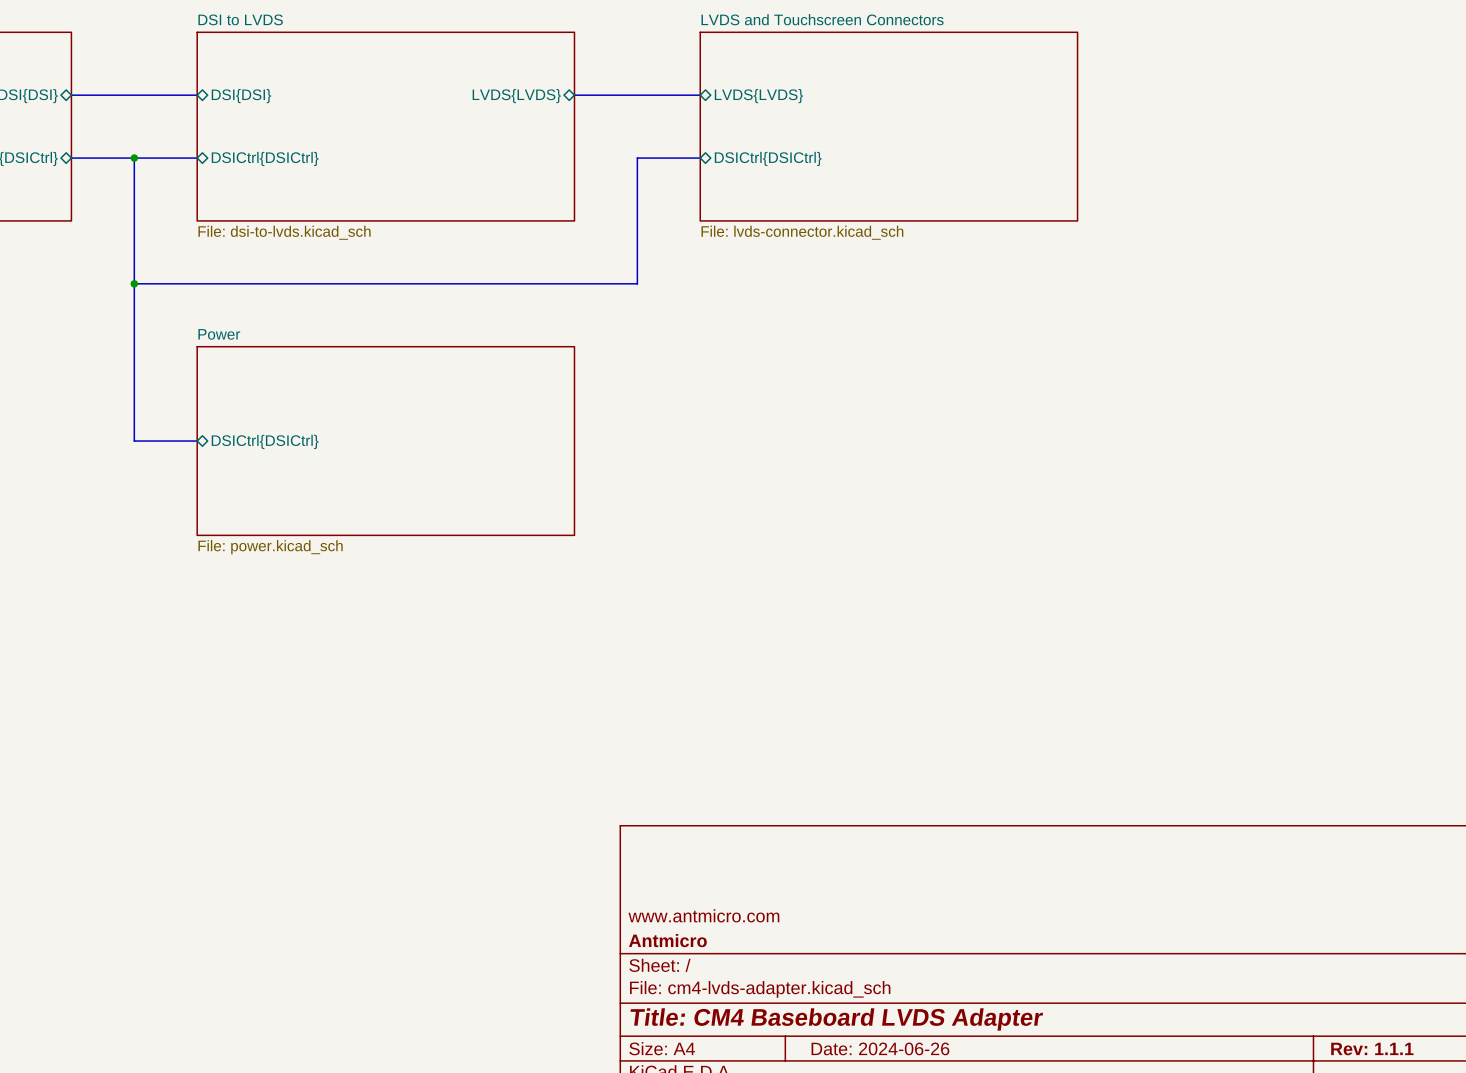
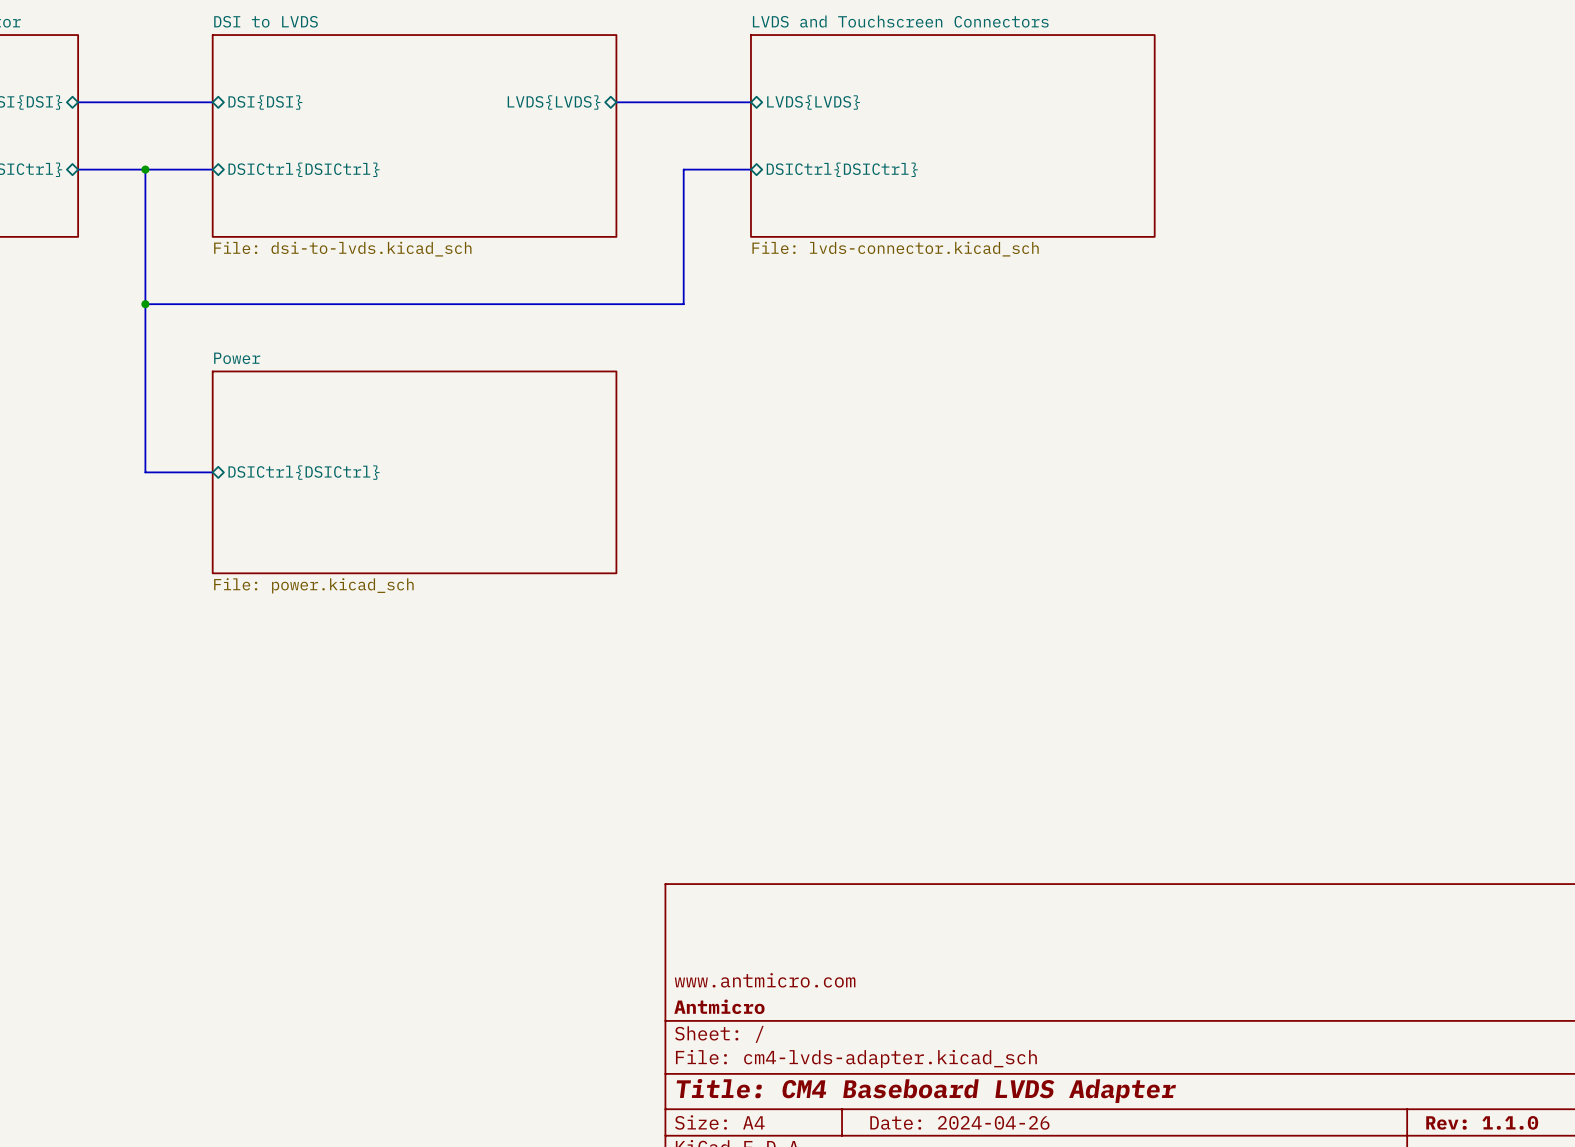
title block: Date: 2024-06-26 (880, 1048) -> Date: 2024-04-26 (959, 1122)
title block: Rev: 1.1.1 (1372, 1049) -> Rev: 1.1.0 (1482, 1122)

